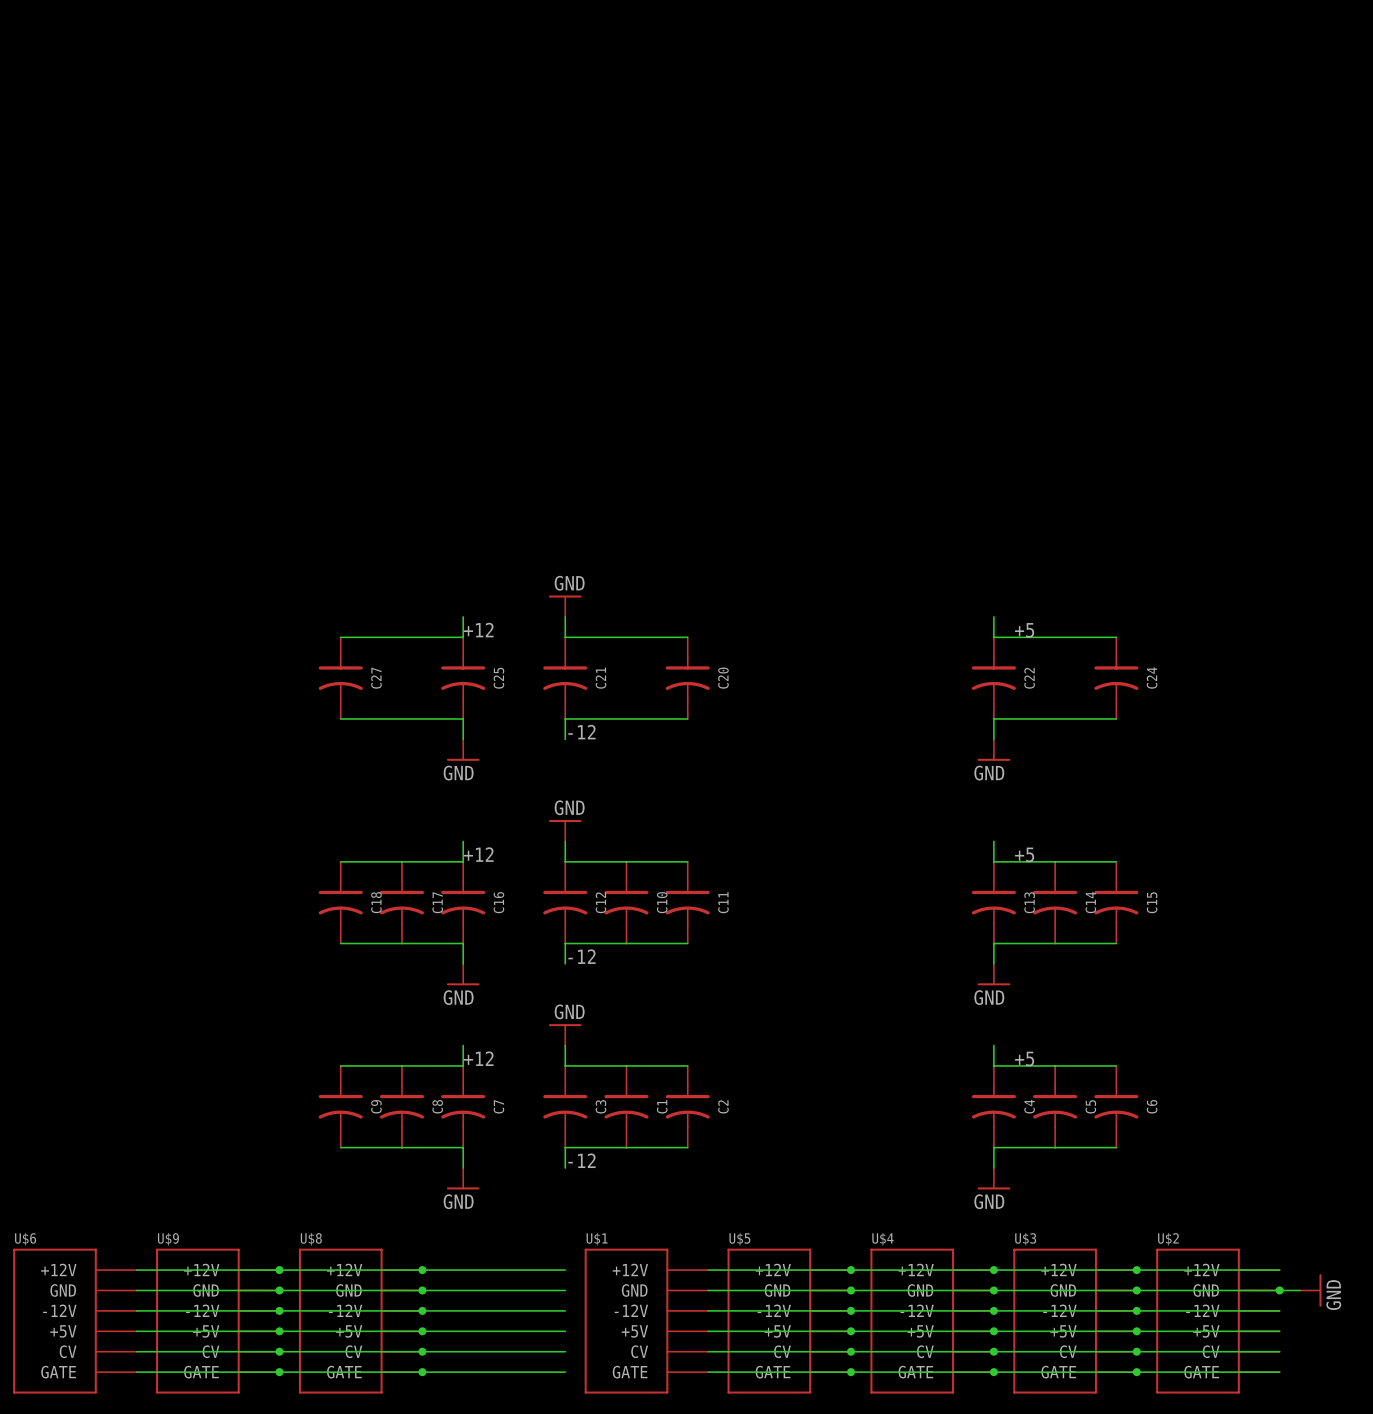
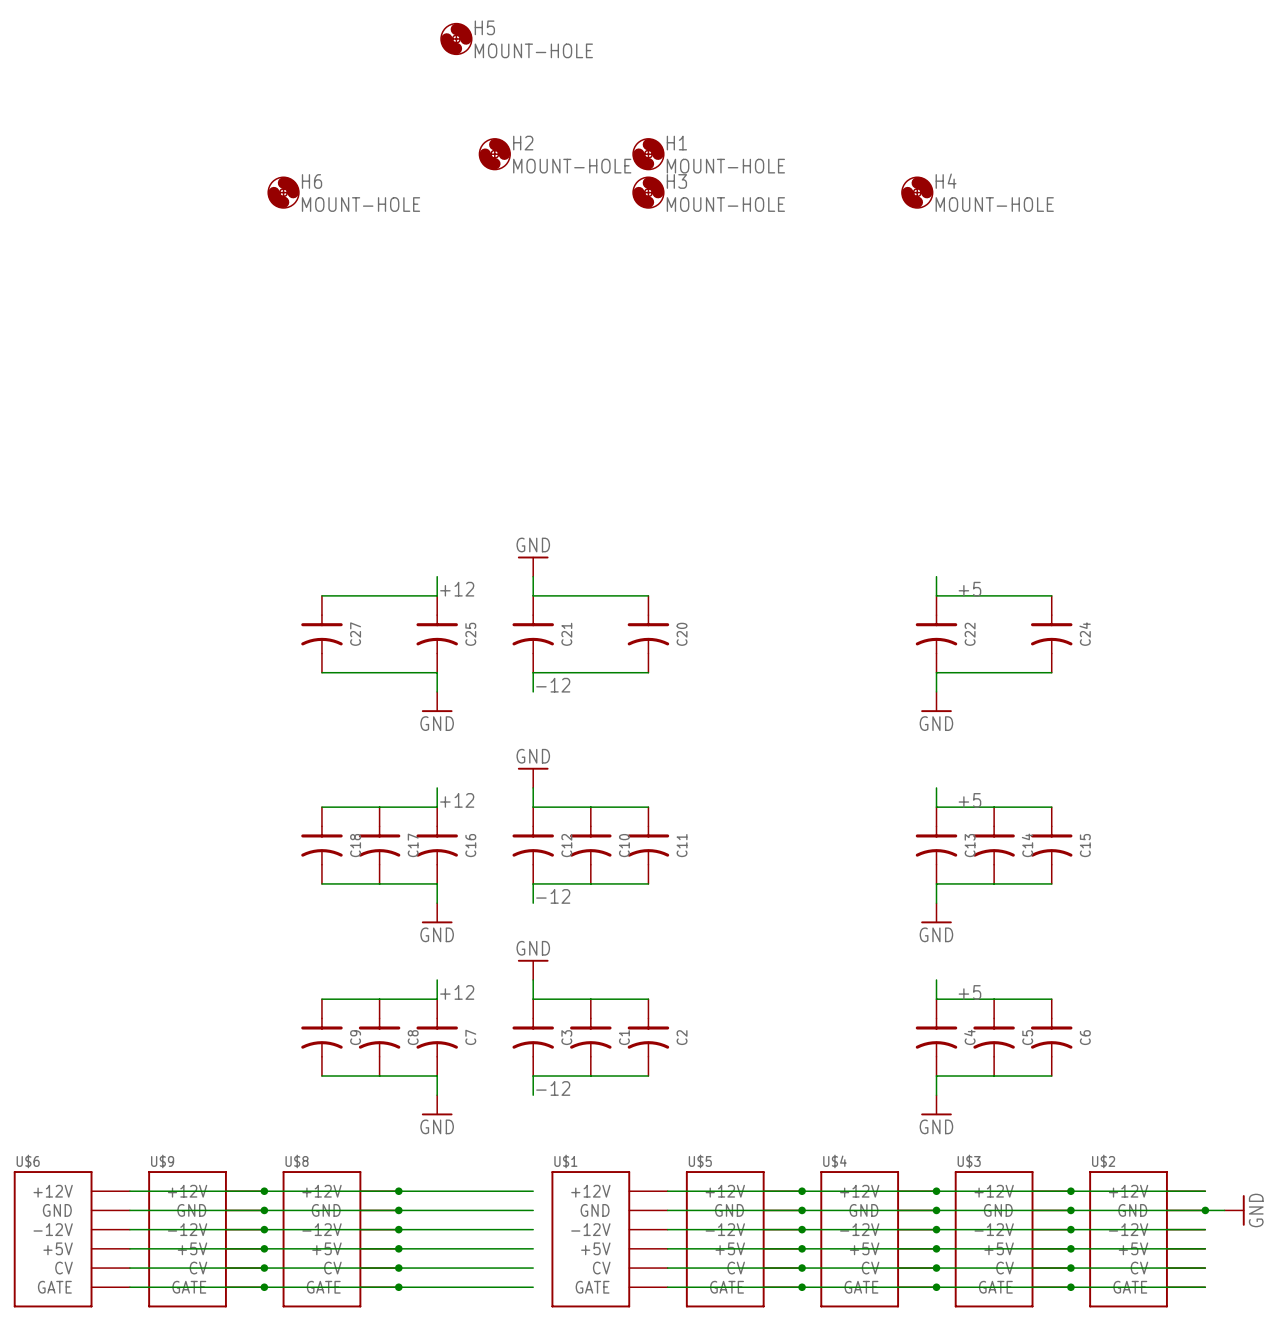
H5: none -> MOUNT-HOLE (456, 38)
H2: none -> MOUNT-HOLE (494, 154)
H1: none -> MOUNT-HOLE (648, 154)
H6: none -> MOUNT-HOLE (283, 192)
H3: none -> MOUNT-HOLE (648, 192)
H4: none -> MOUNT-HOLE (917, 192)

